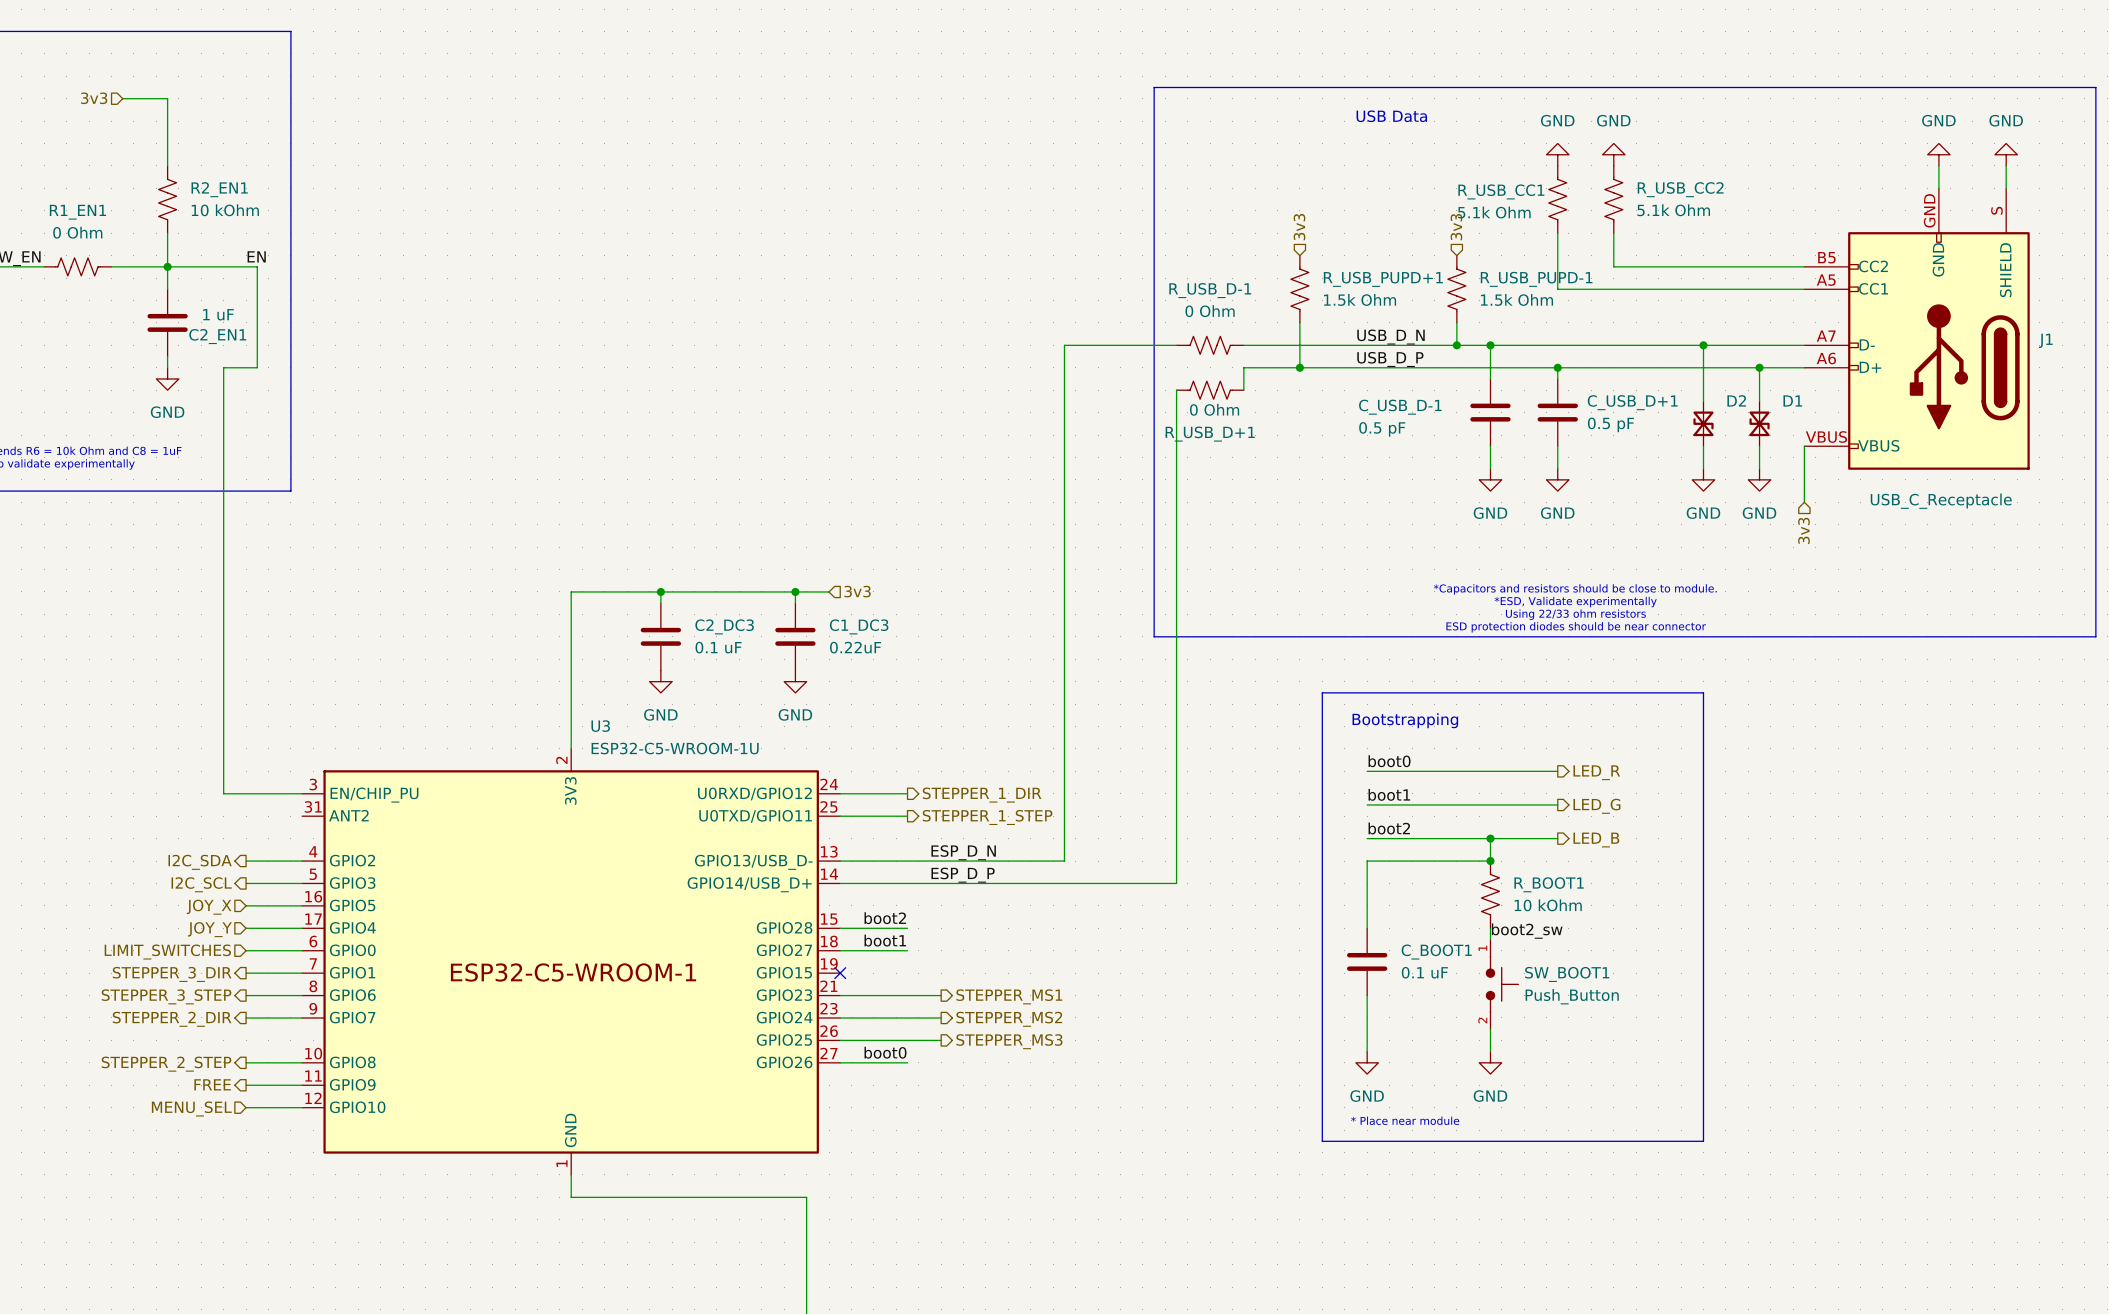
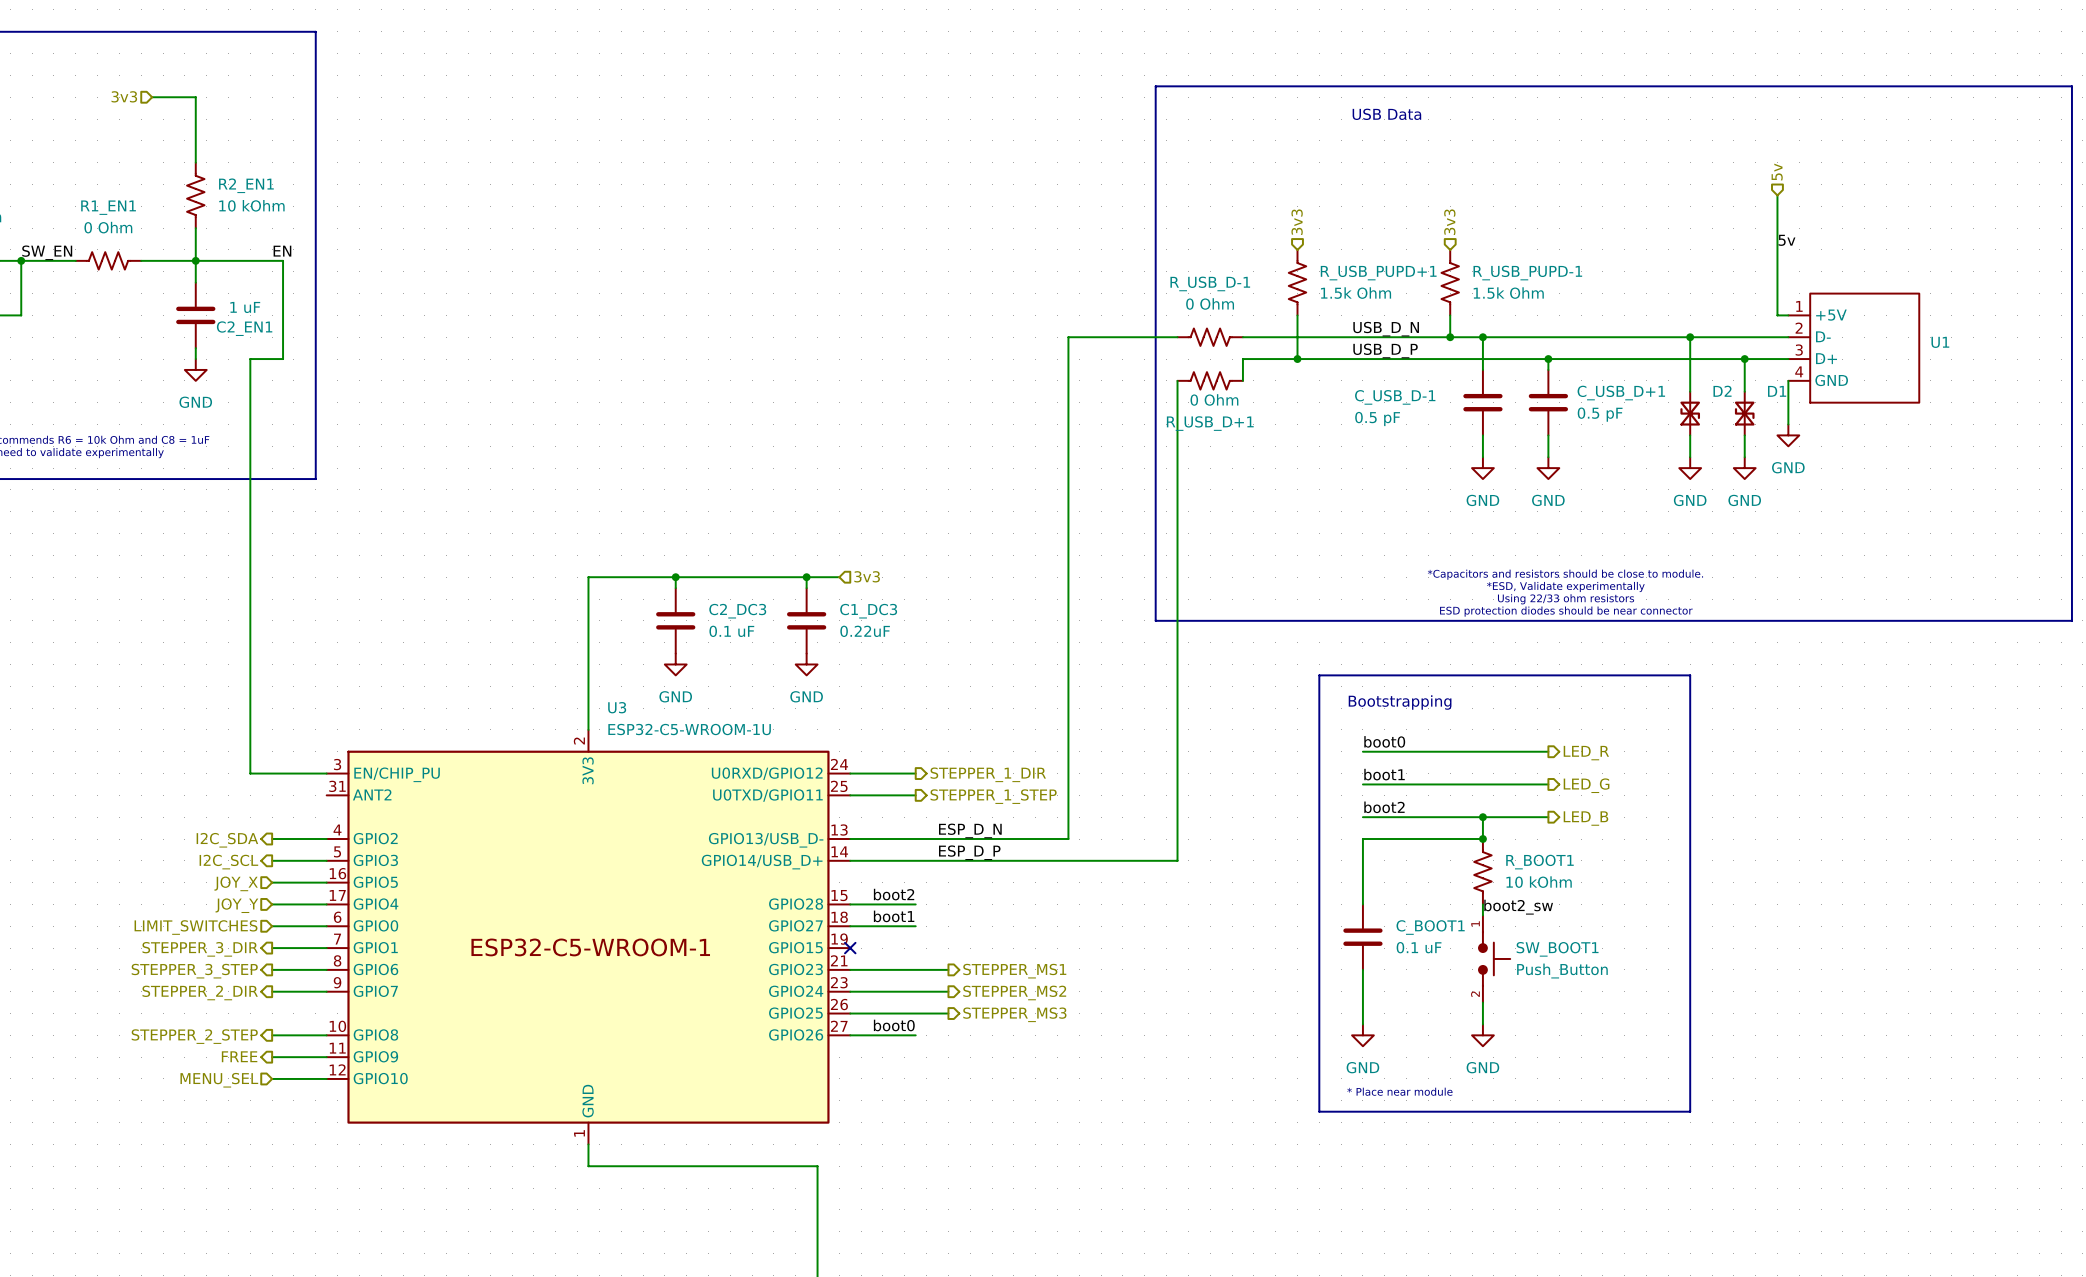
power symbol: GND (1557, 154) -> none
power symbol: GND (1613, 154) -> none
power symbol: GND (1938, 154) -> none
power symbol: GND (2006, 154) -> none
wire: (1938, 165) (1938, 188) -> none
wire: (2006, 165) (2006, 188) -> none
hierarchical label: none -> 5v (1777, 172)
R_USB_CC1: 5.1k Ohm (1557, 199) -> none
R_USB_CC2: 5.1k Ohm (1613, 199) -> none
wire: none -> (1777, 195) (1777, 315) (1788, 315)
wire: (1557, 233) (1557, 289) (1804, 289) -> none
wire: (1613, 233) (1613, 266) (1804, 266) -> none
label: none -> 5v (1787, 240)
J1: USB_C_Receptacle (1917, 329) -> none
U1: none -> (1853, 348)
wire: none -> (1788, 380) (1788, 424)
wire: (1804, 446) (1804, 502) -> none
power symbol: none -> GND (1788, 435)
hierarchical label: 3v3 (1803, 530) -> none

